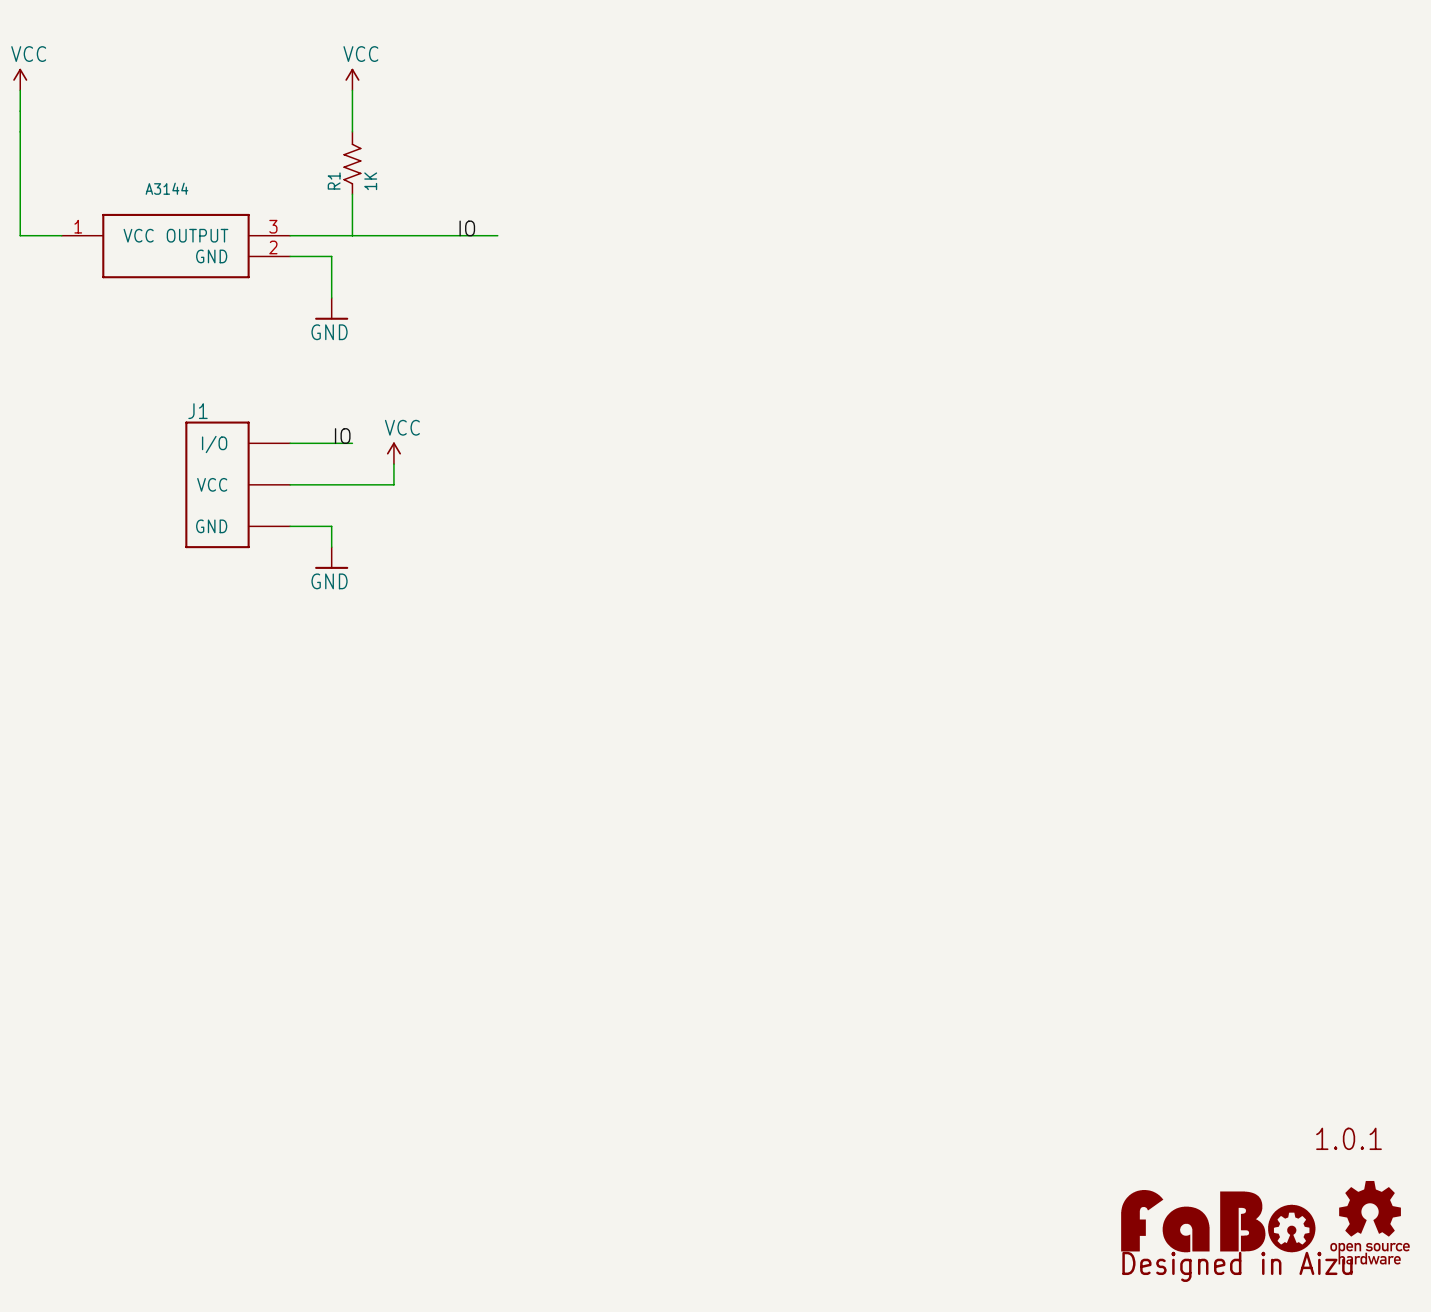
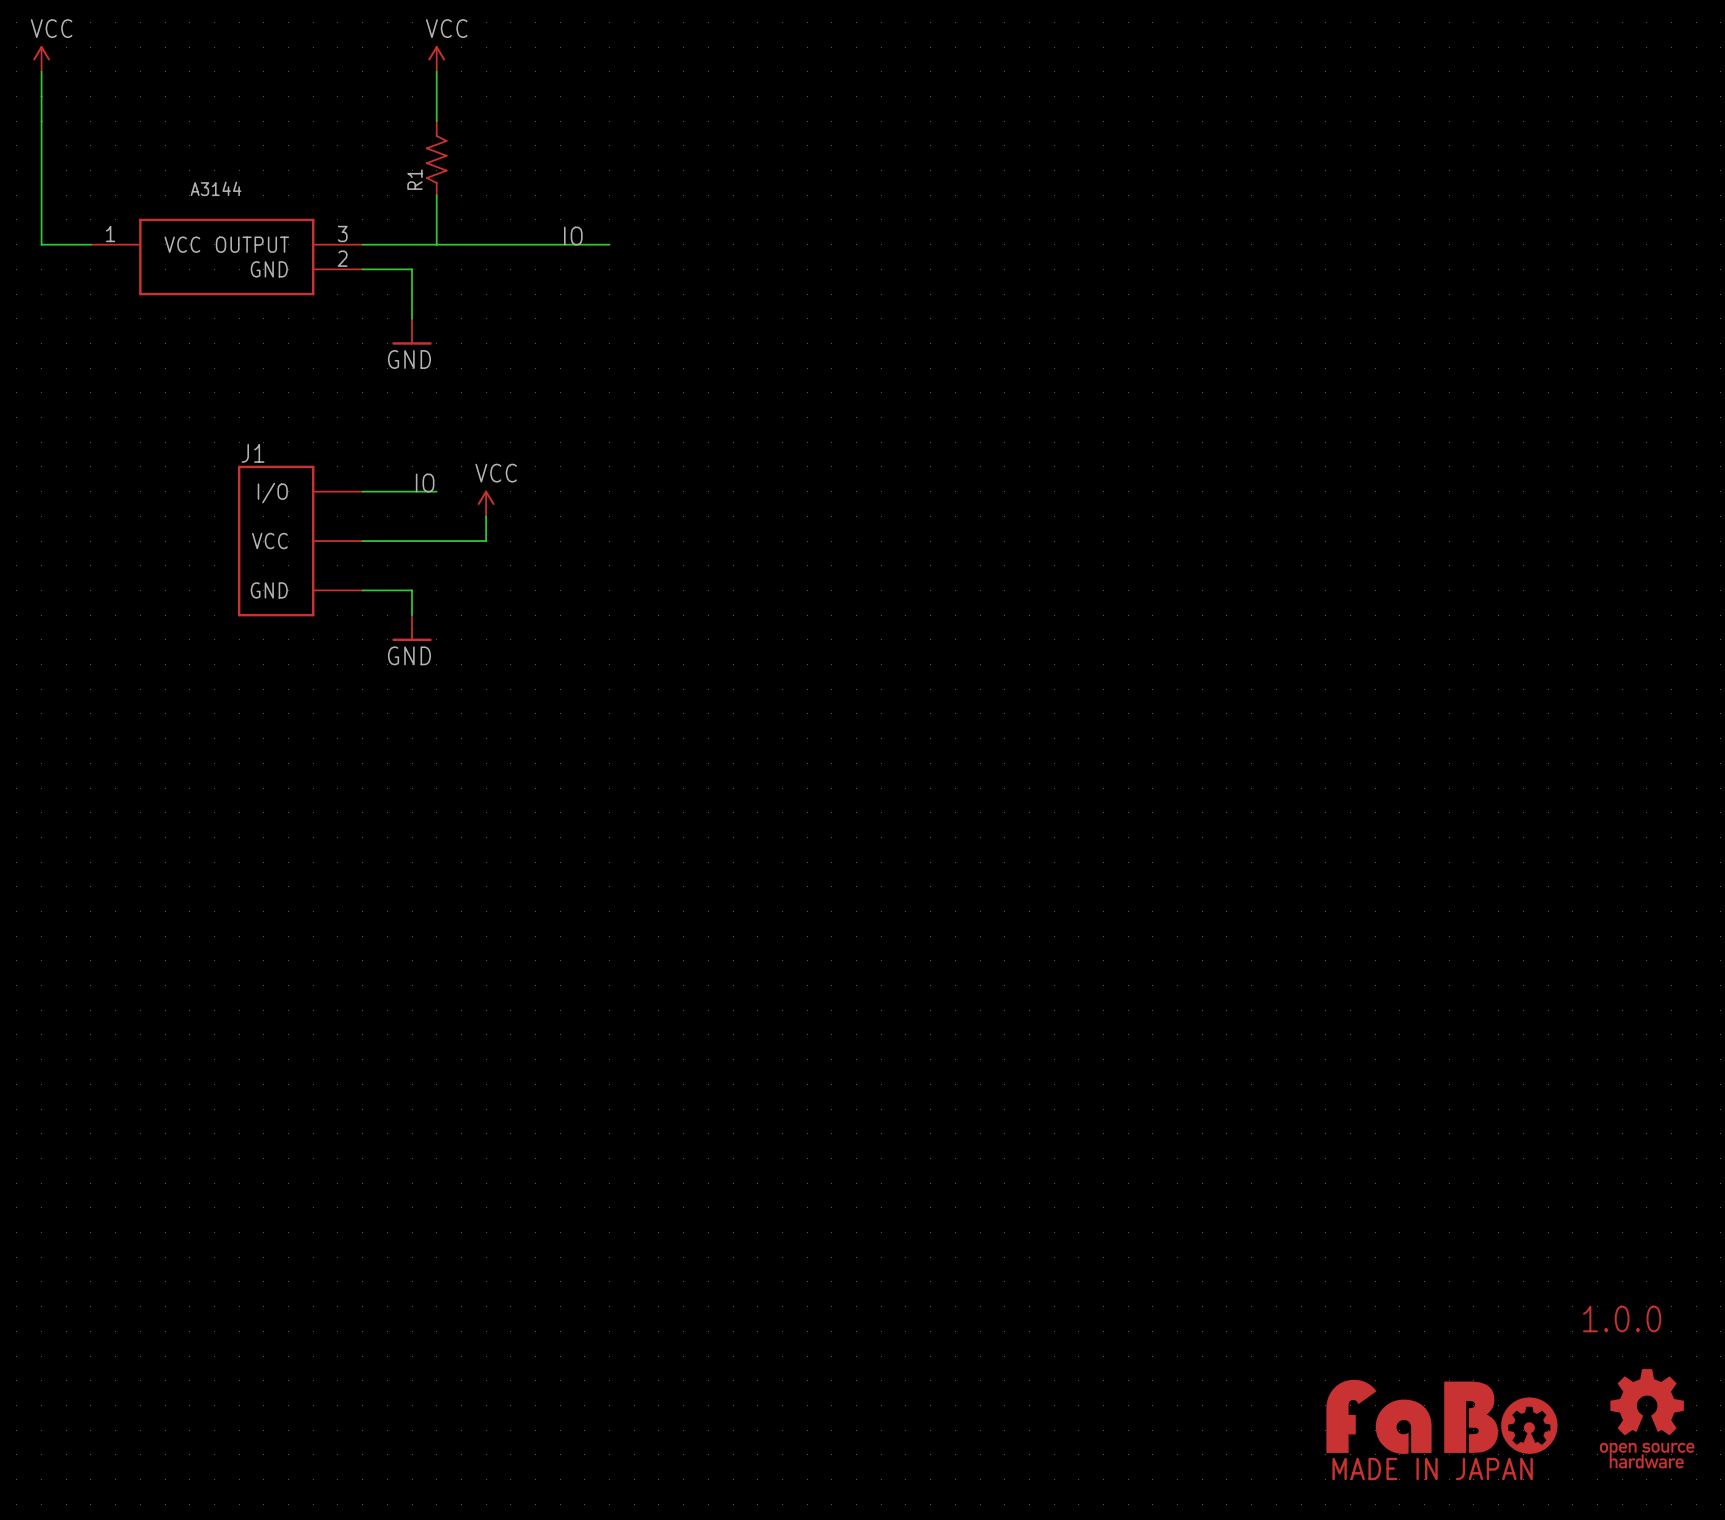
R1 value: 1K (370, 181) -> none
text: 1.0.1 (1349, 1138) -> 1.0.0 (1622, 1318)
part: none -> (1441, 1416)
part: (1218, 1221) -> none

